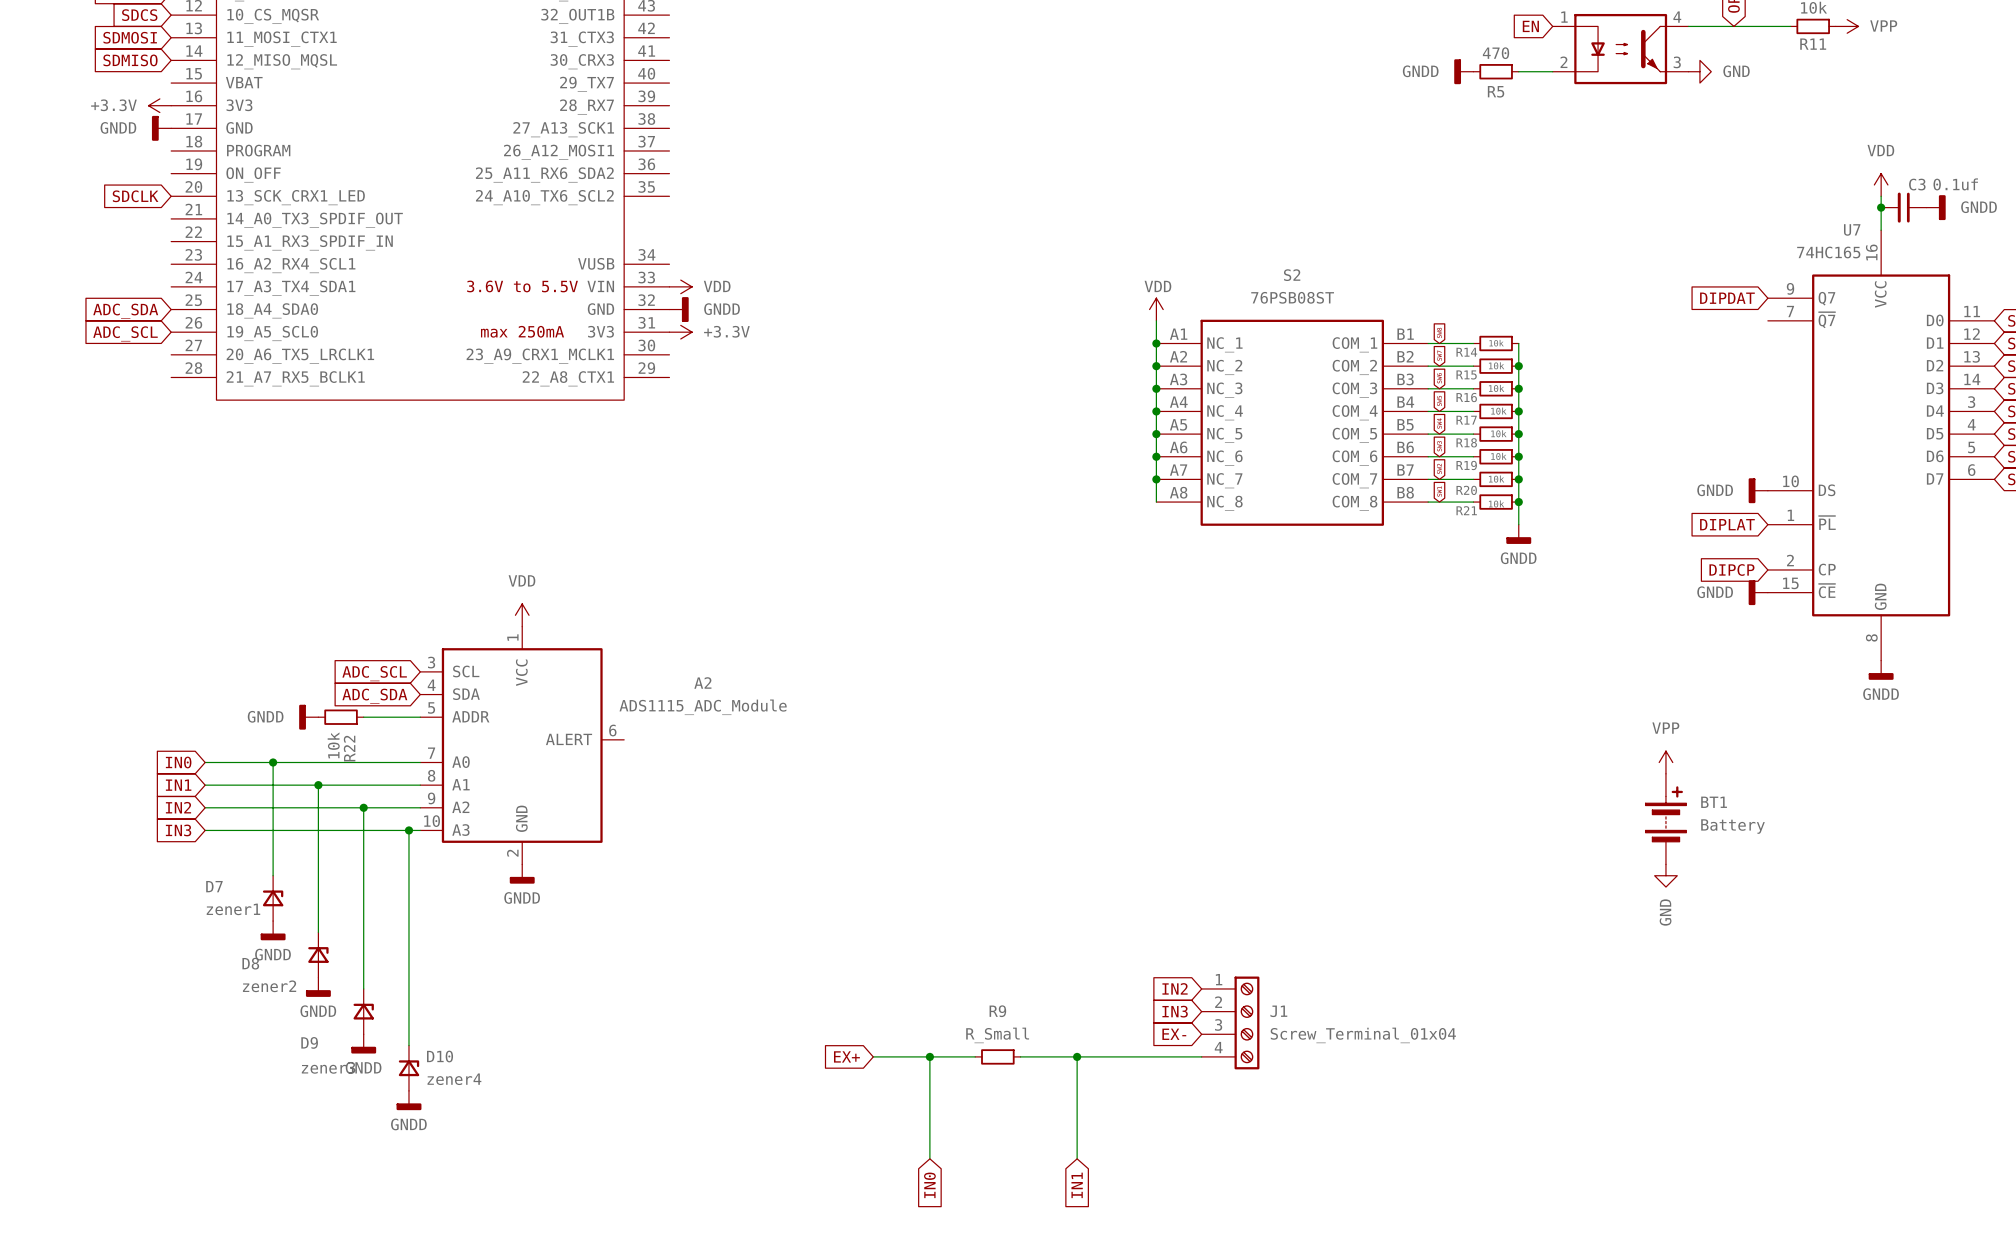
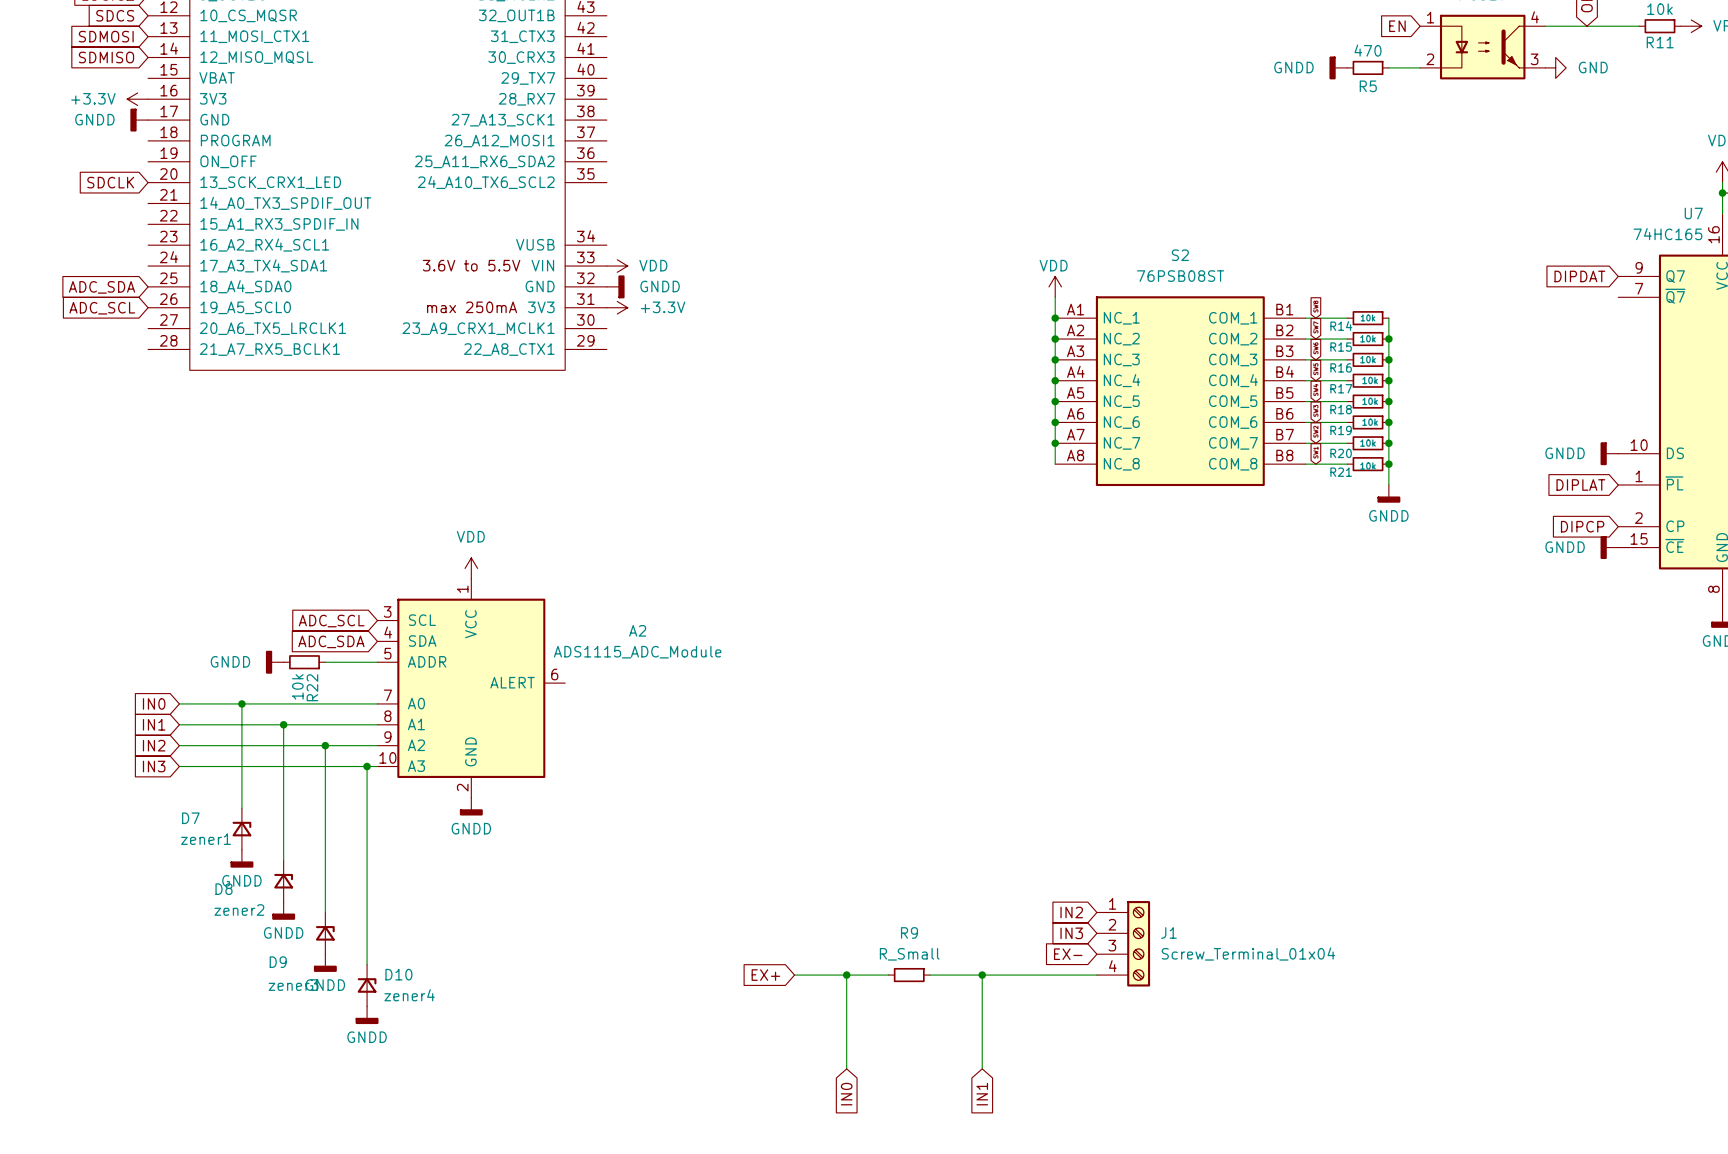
power symbol: VPP (1665, 762) -> none
BT1: Battery (1665, 819) -> none
power symbol: GND (1665, 875) -> none

